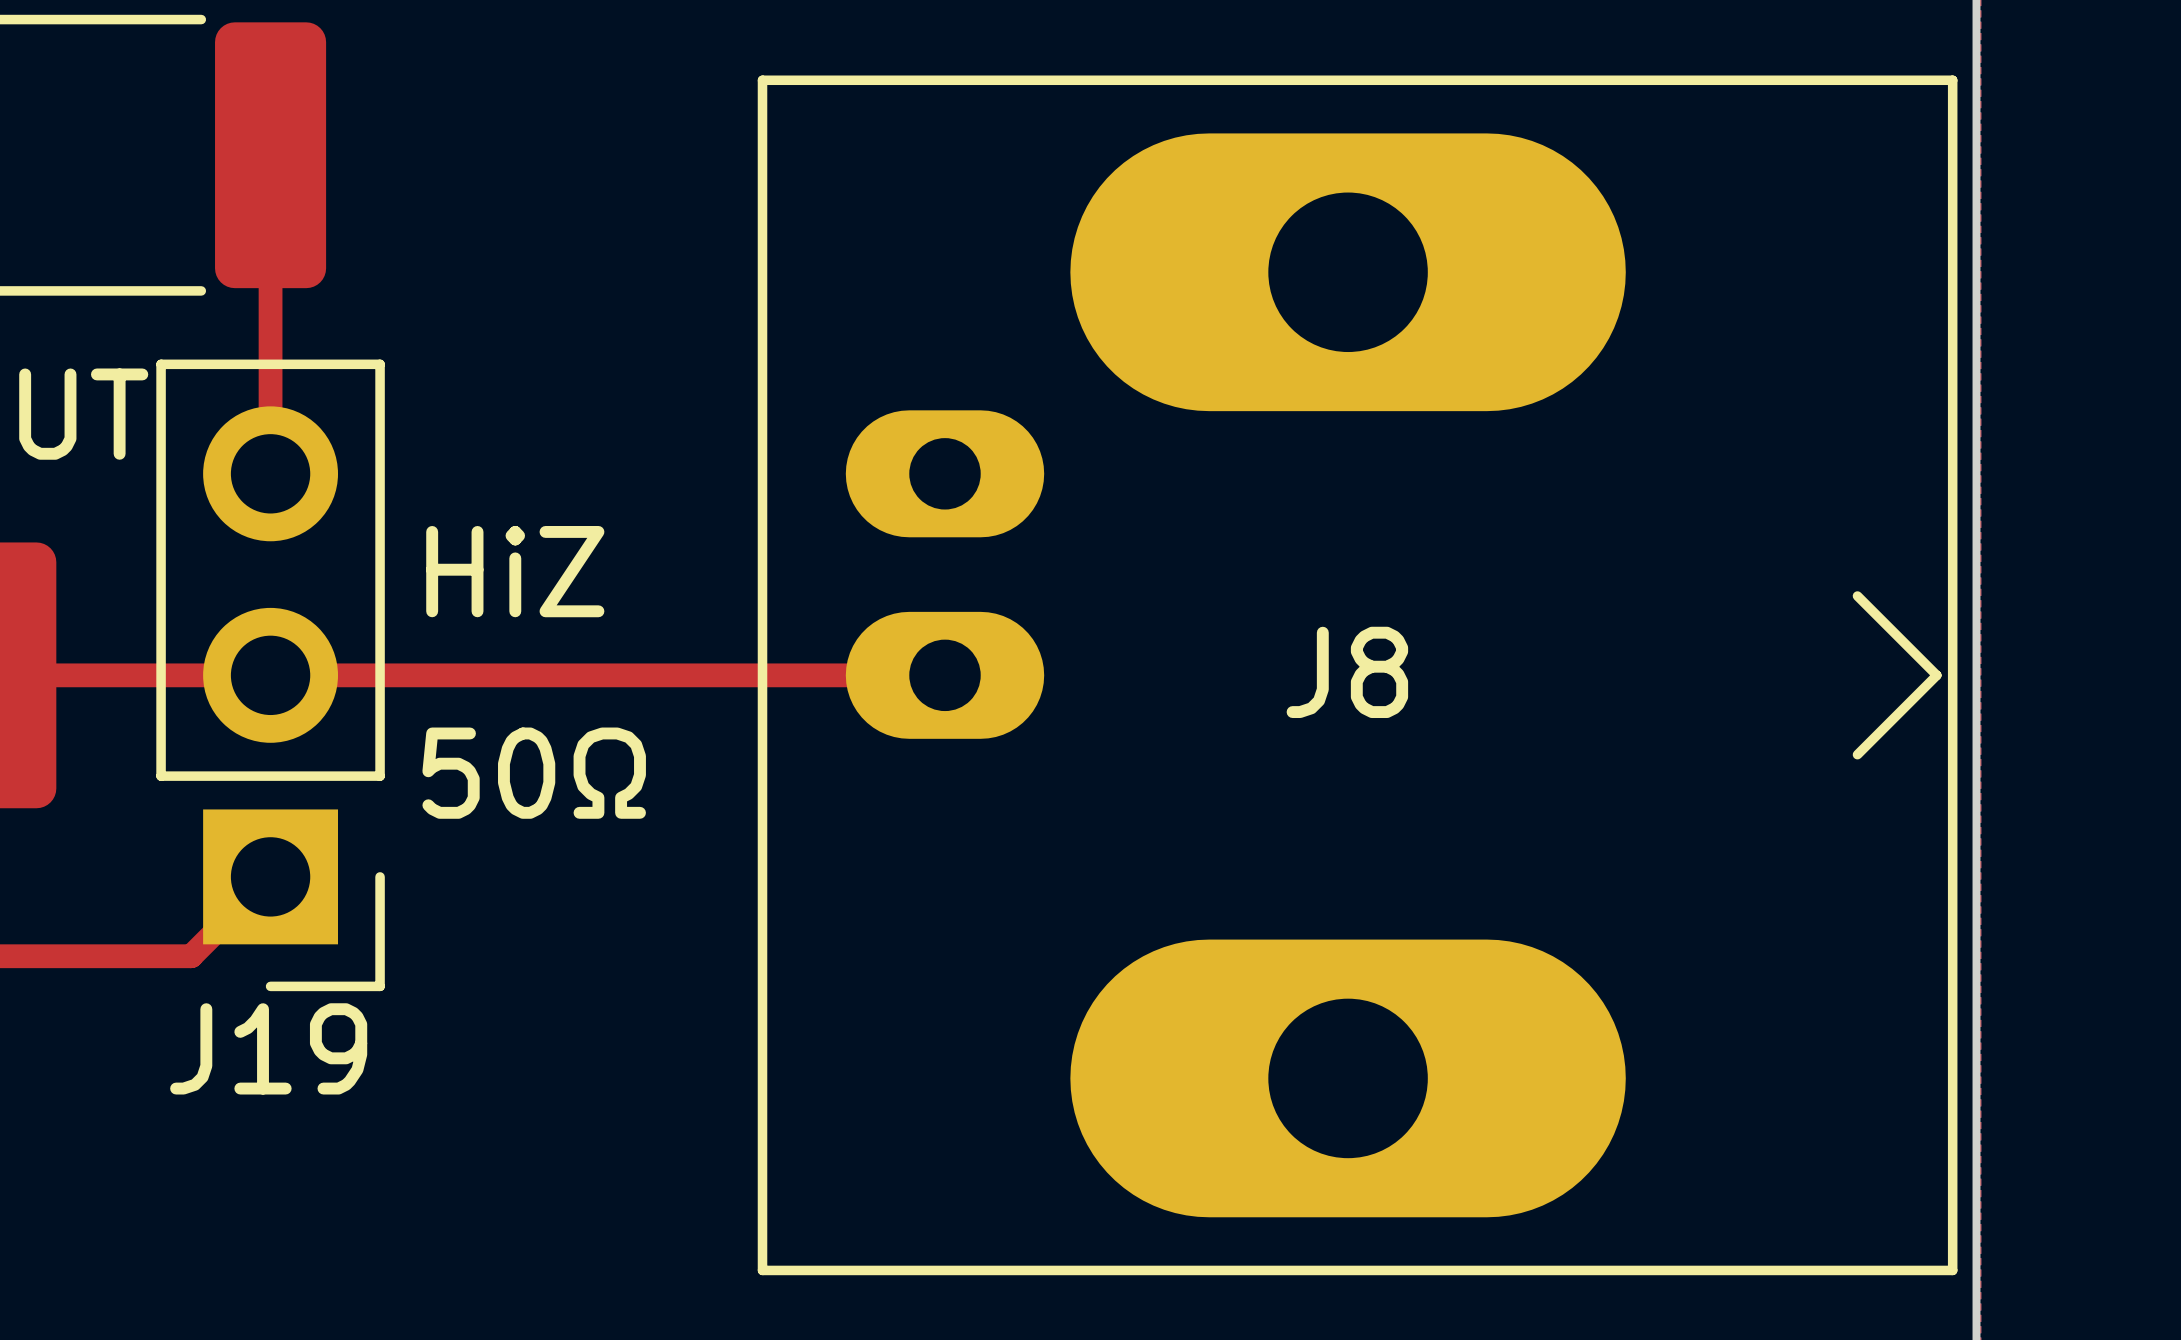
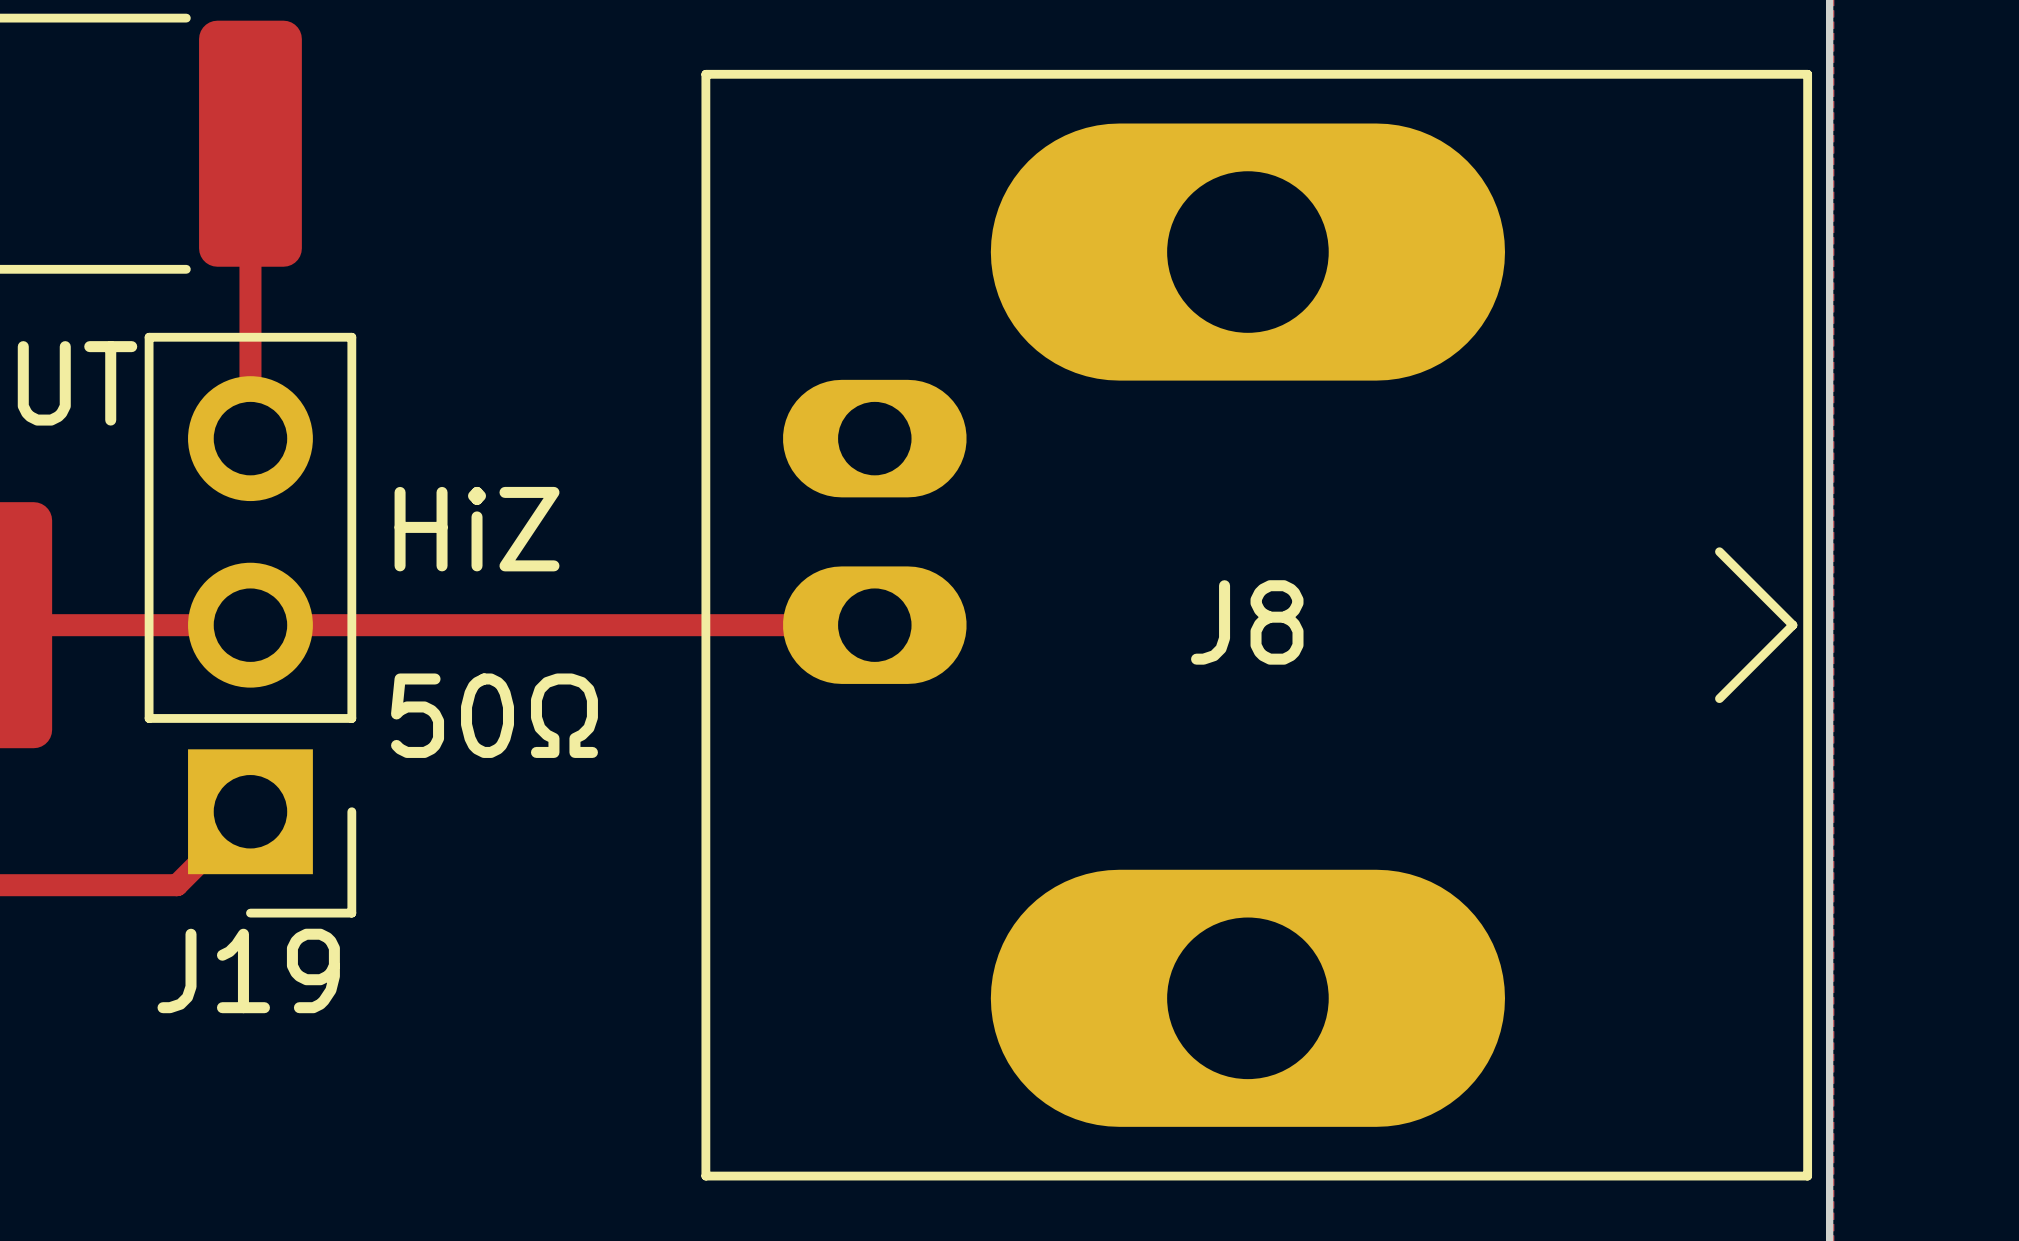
J8 footprint: [757, 75, 1958, 1276] -> [701, 69, 1813, 1181]

